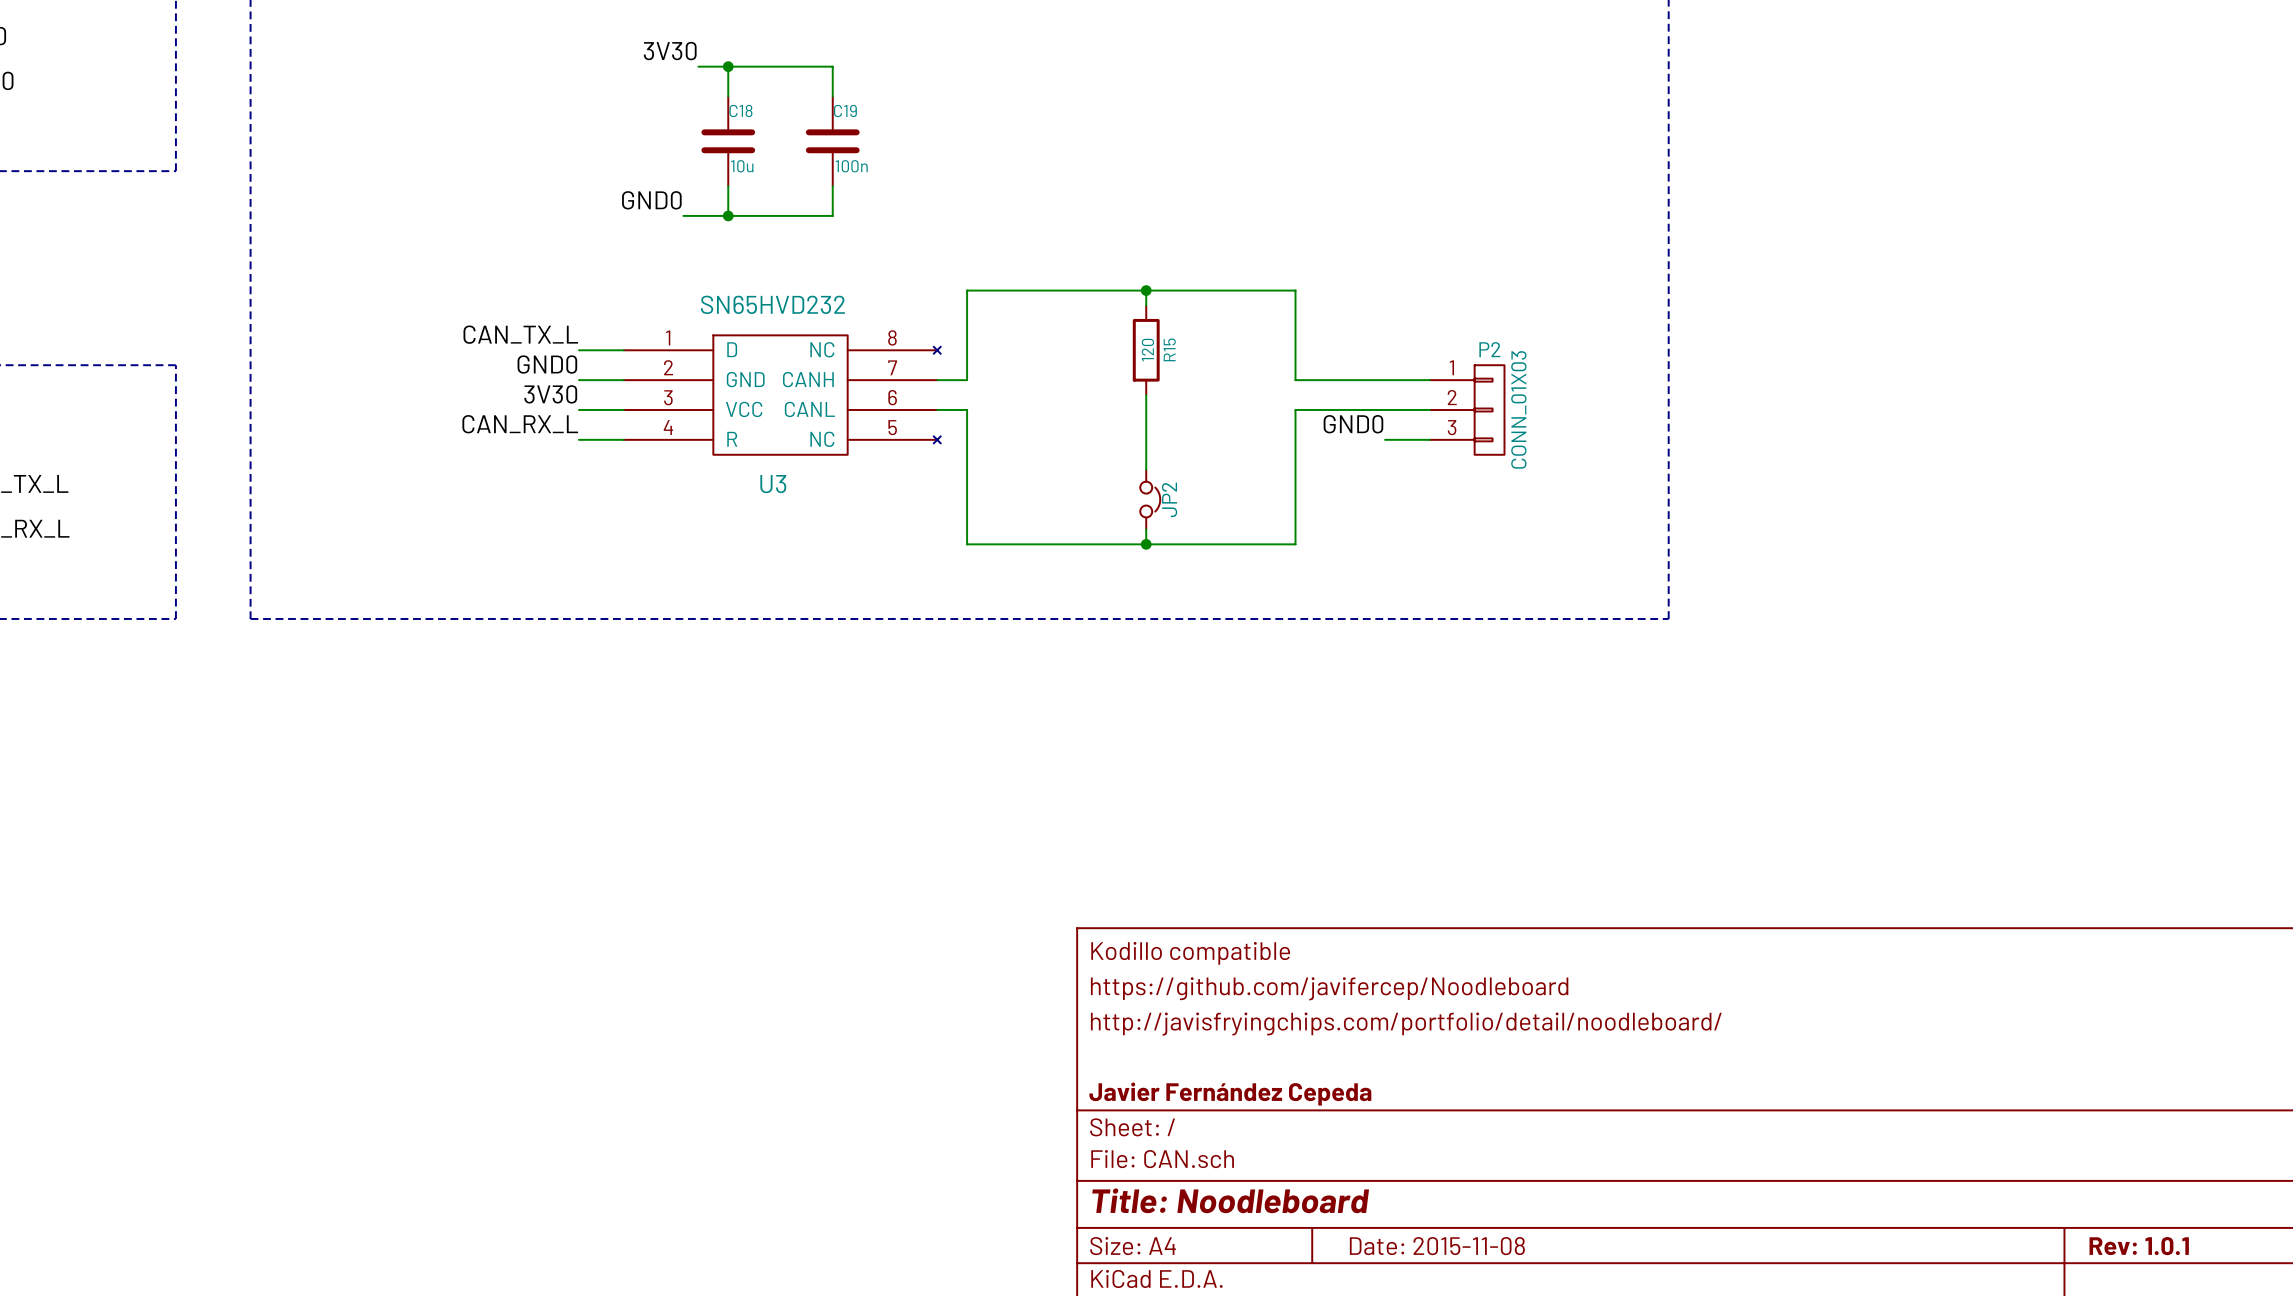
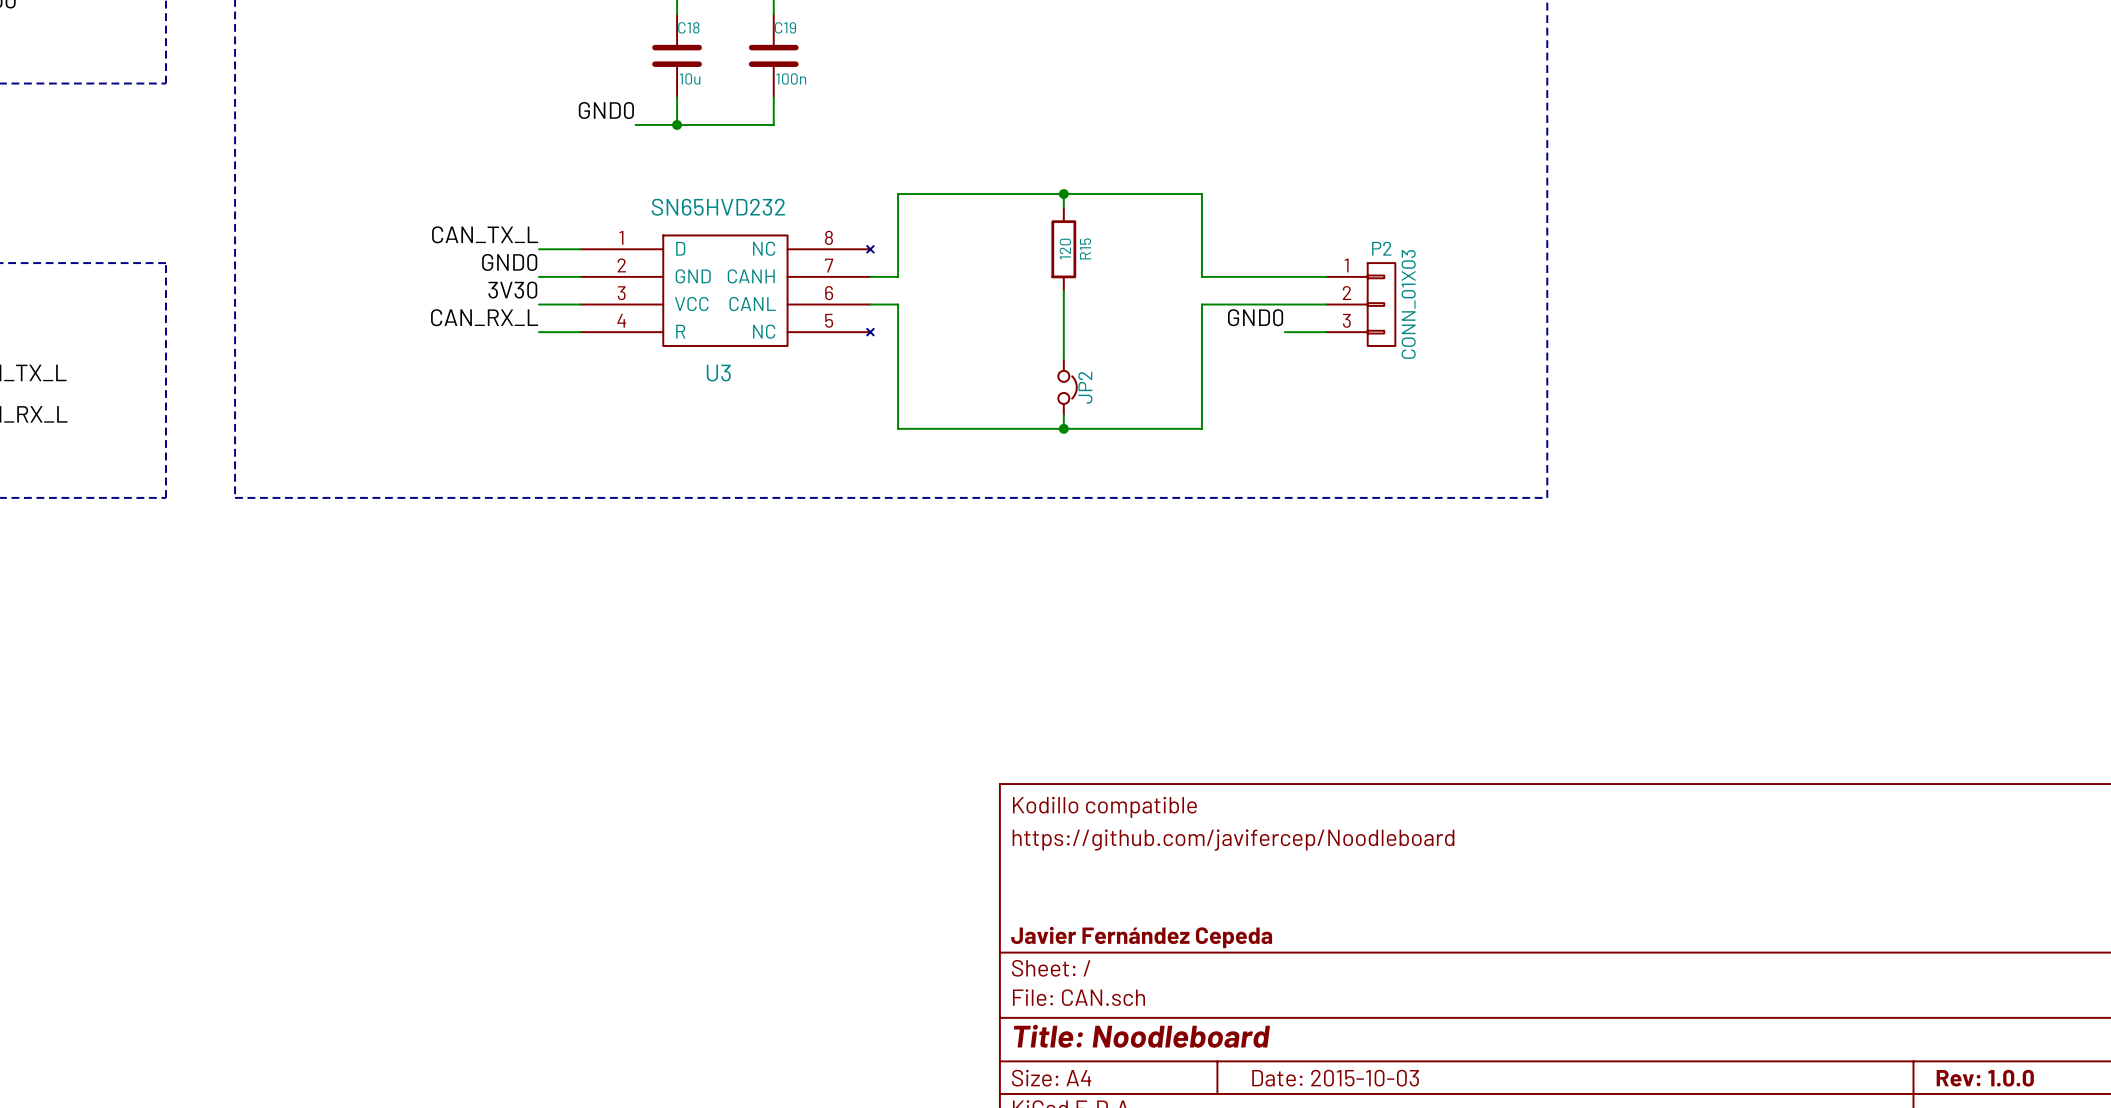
title block: http://javisfryingchips.com/portfolio/detail/noodleboard/ (1406, 1024) -> none
title block: Date: 2015-11-08 (1437, 1246) -> Date: 2015-10-03 (1335, 1078)
title block: Rev: 1.0.1 (2139, 1246) -> Rev: 1.0.0 (1985, 1078)

